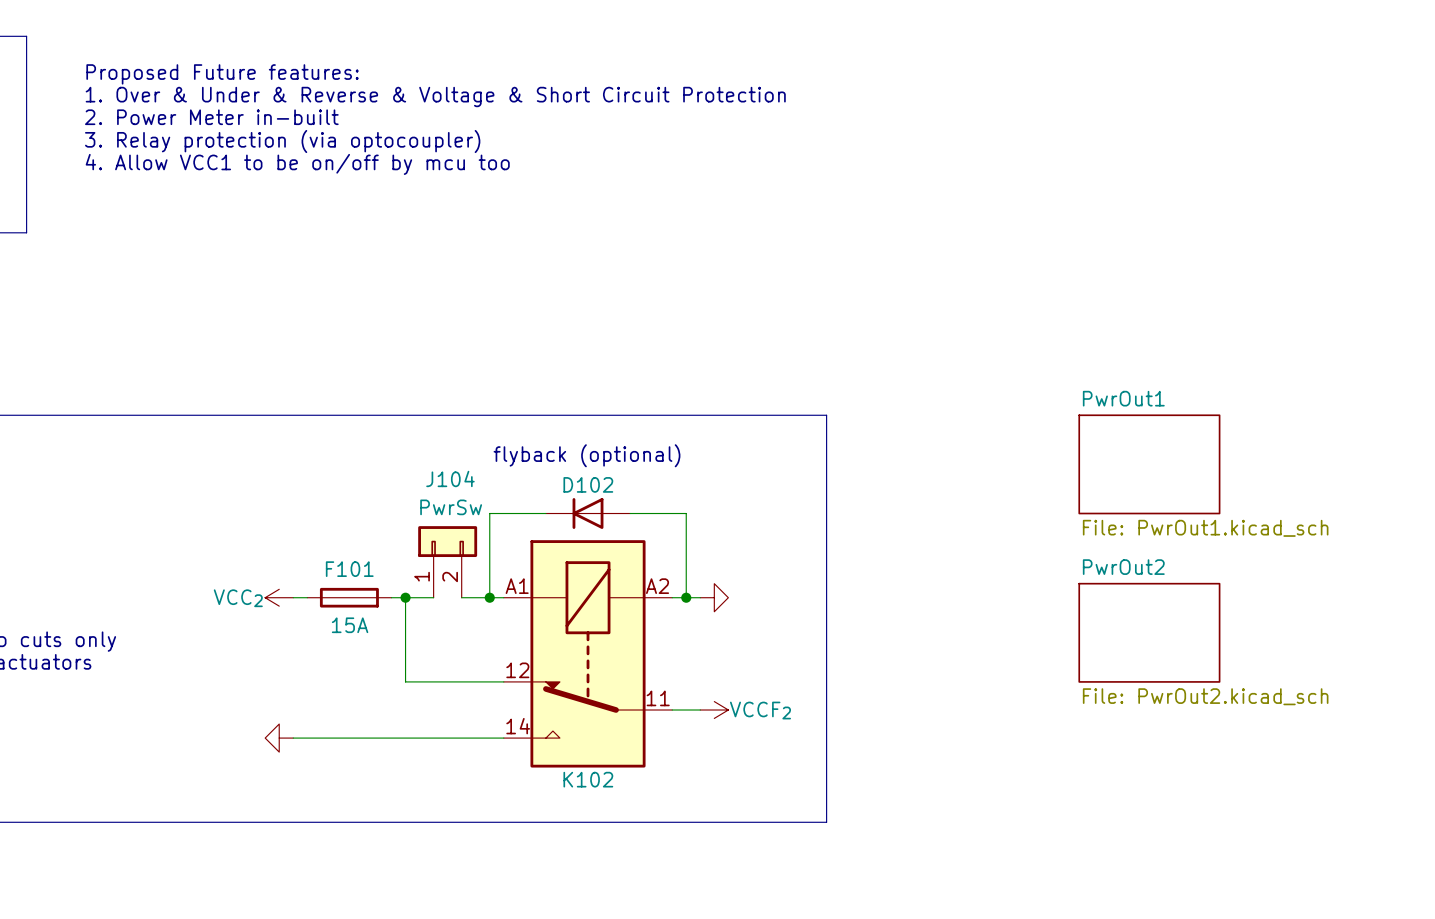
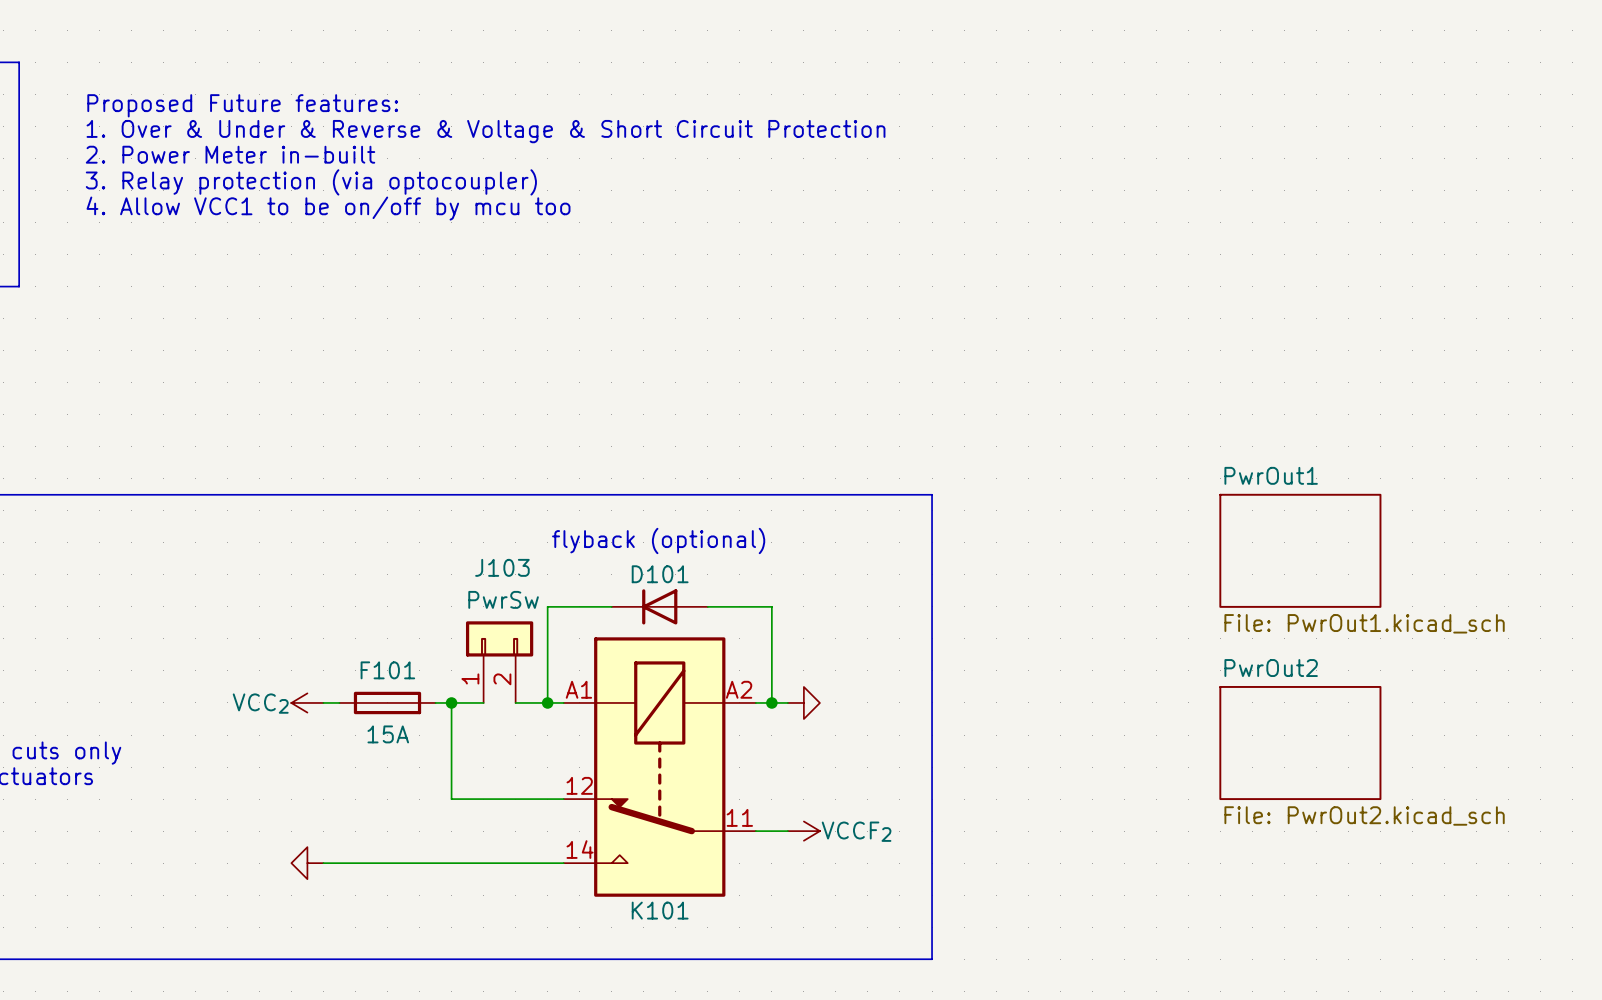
J104 name: J104 (450, 478) -> J103 (502, 567)
D102 name: D102 (588, 484) -> D101 (660, 574)
K102 name: K102 (588, 779) -> K101 (660, 910)

